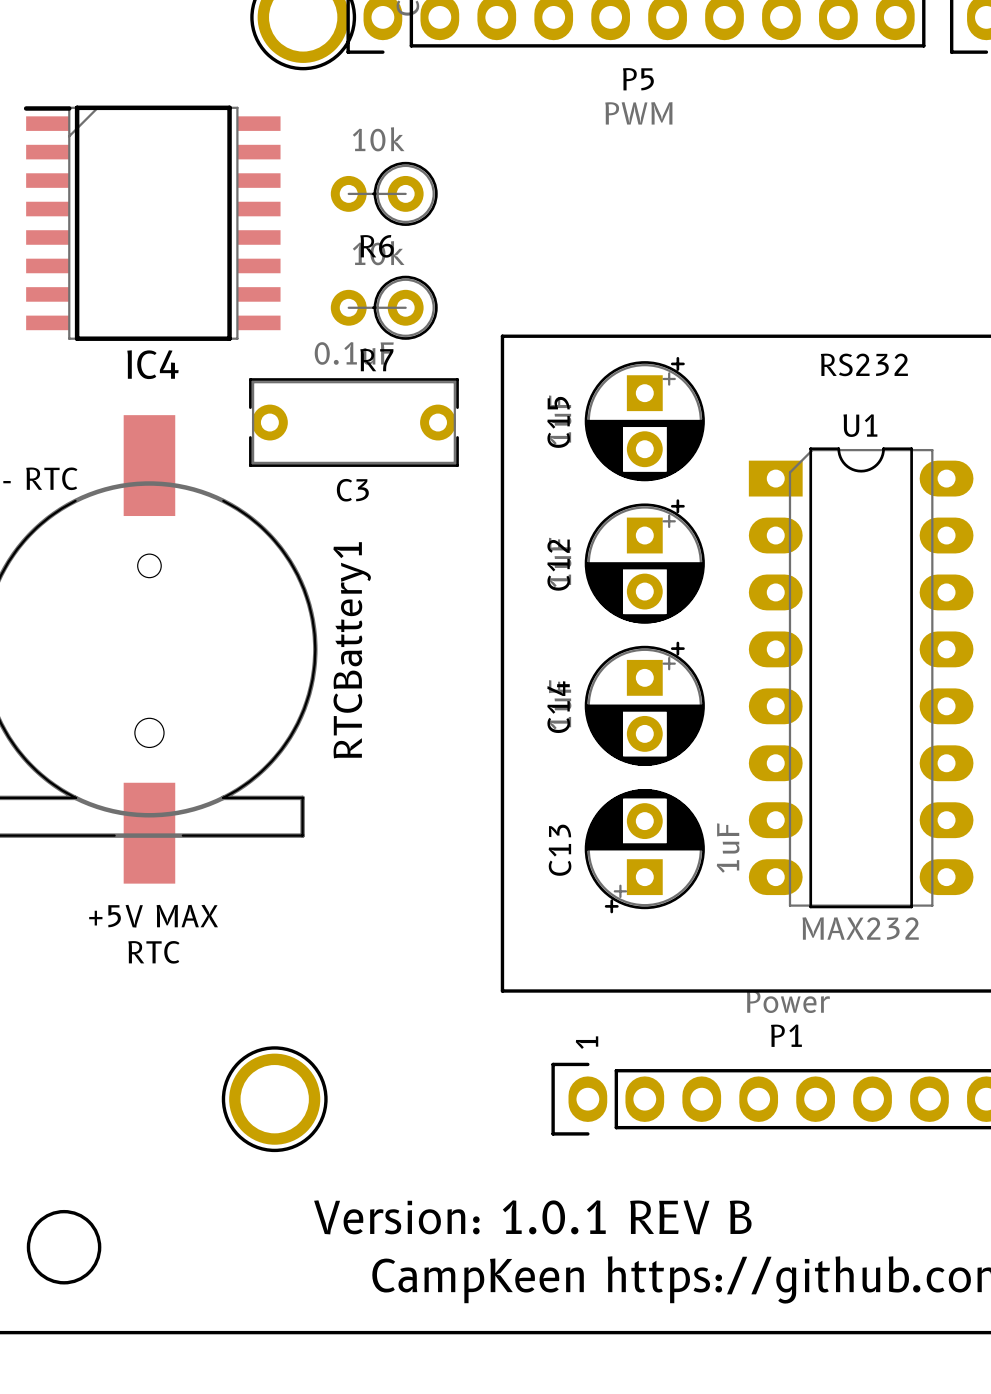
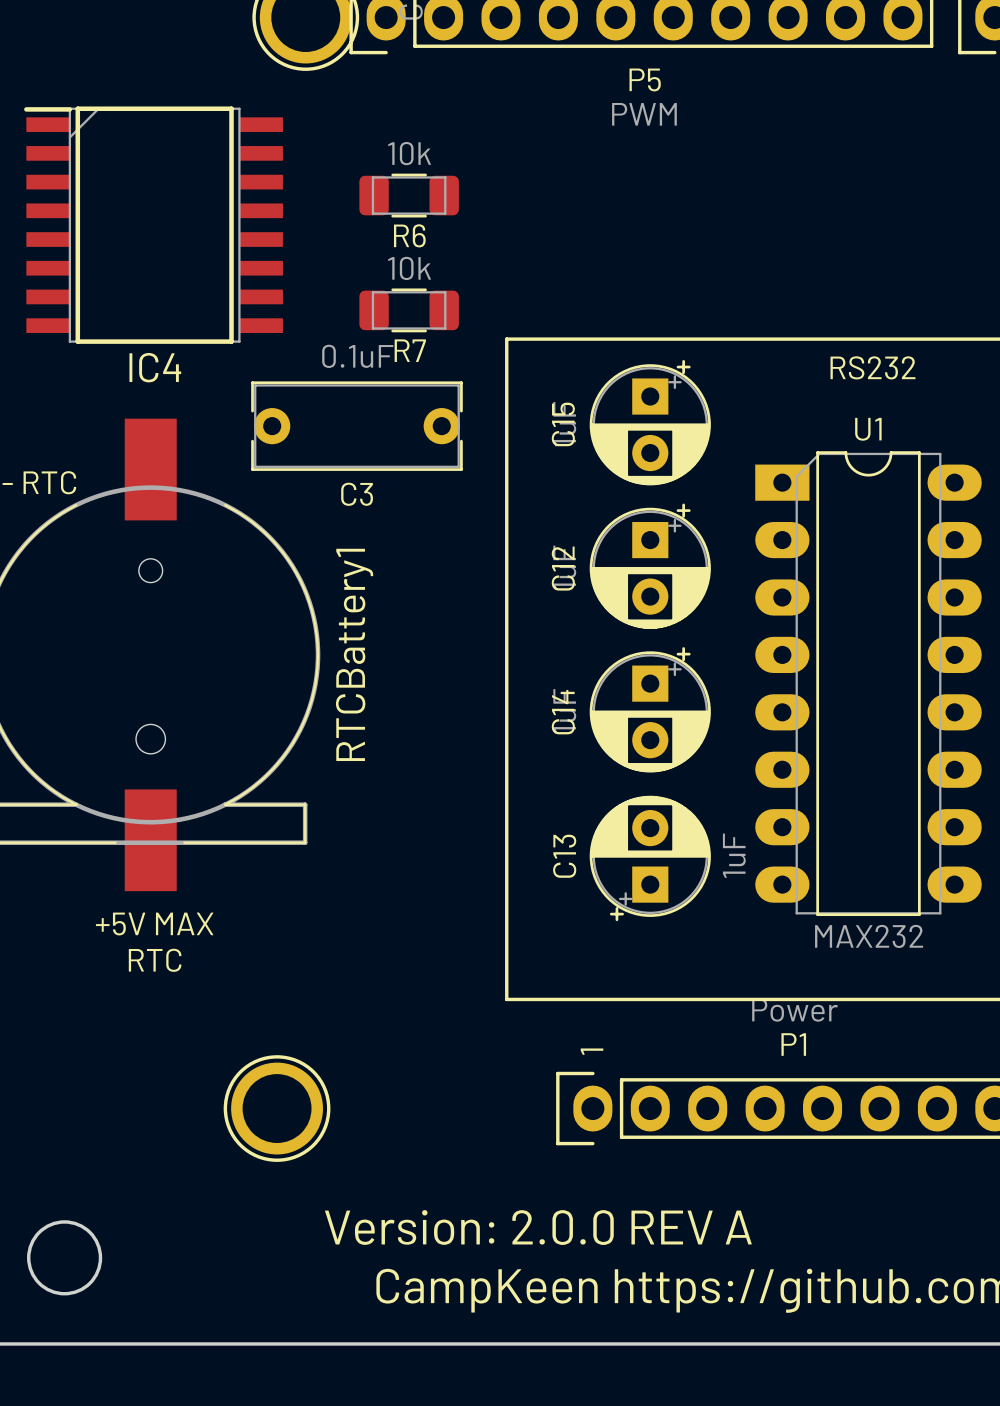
R6 footprint: [330, 161, 438, 226] -> [359, 173, 459, 218]
R7 footprint: [330, 275, 438, 340] -> [359, 288, 459, 333]
text: Version: 1.0.1 REV B (532, 1217) -> Version: 2.0.0 REV A (538, 1227)

